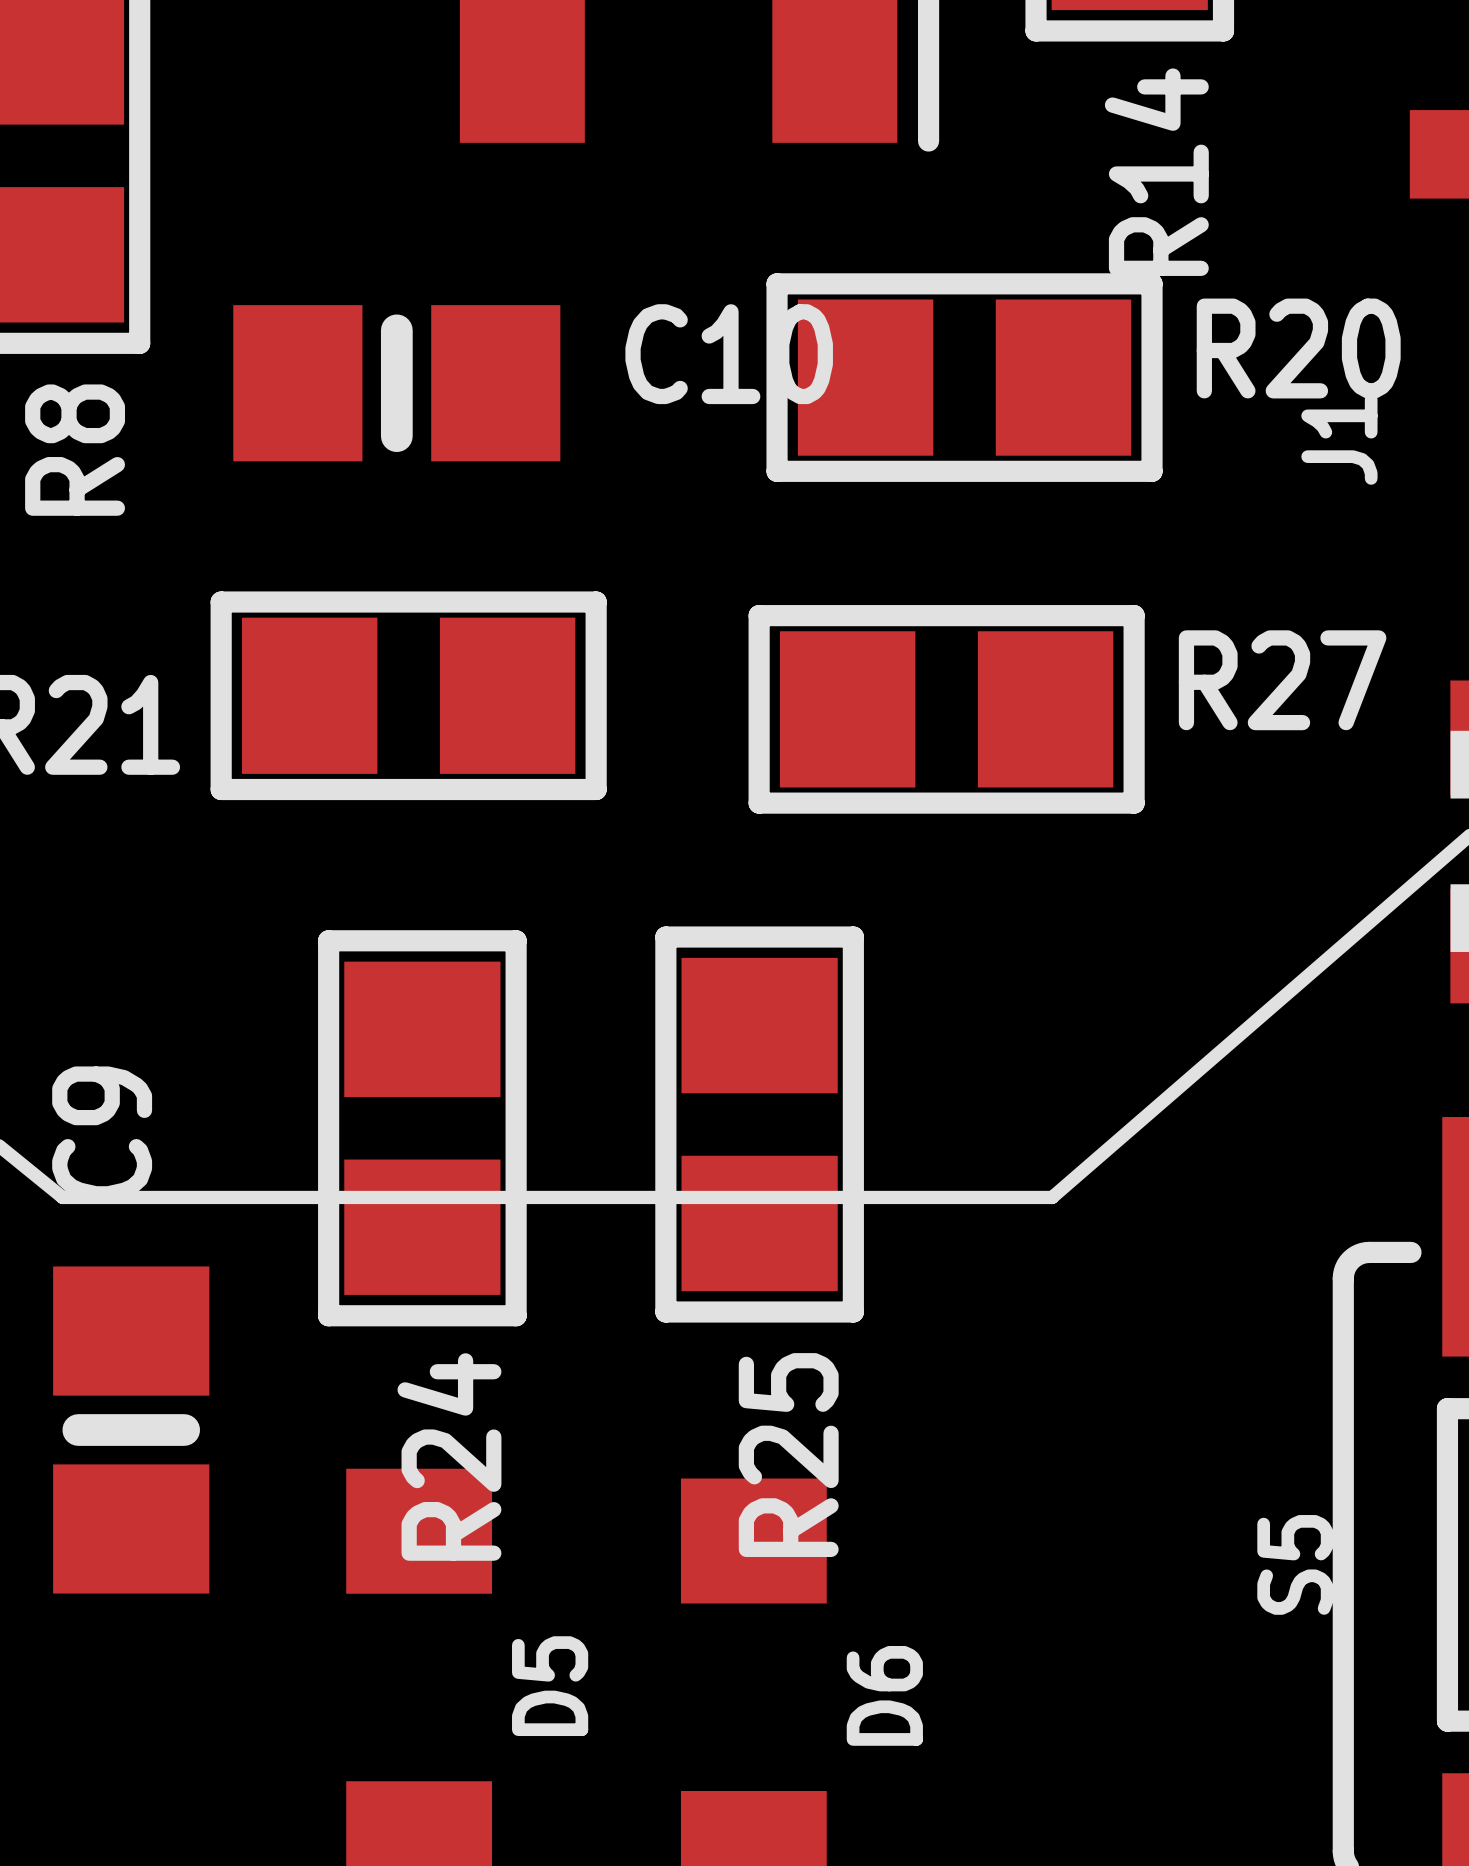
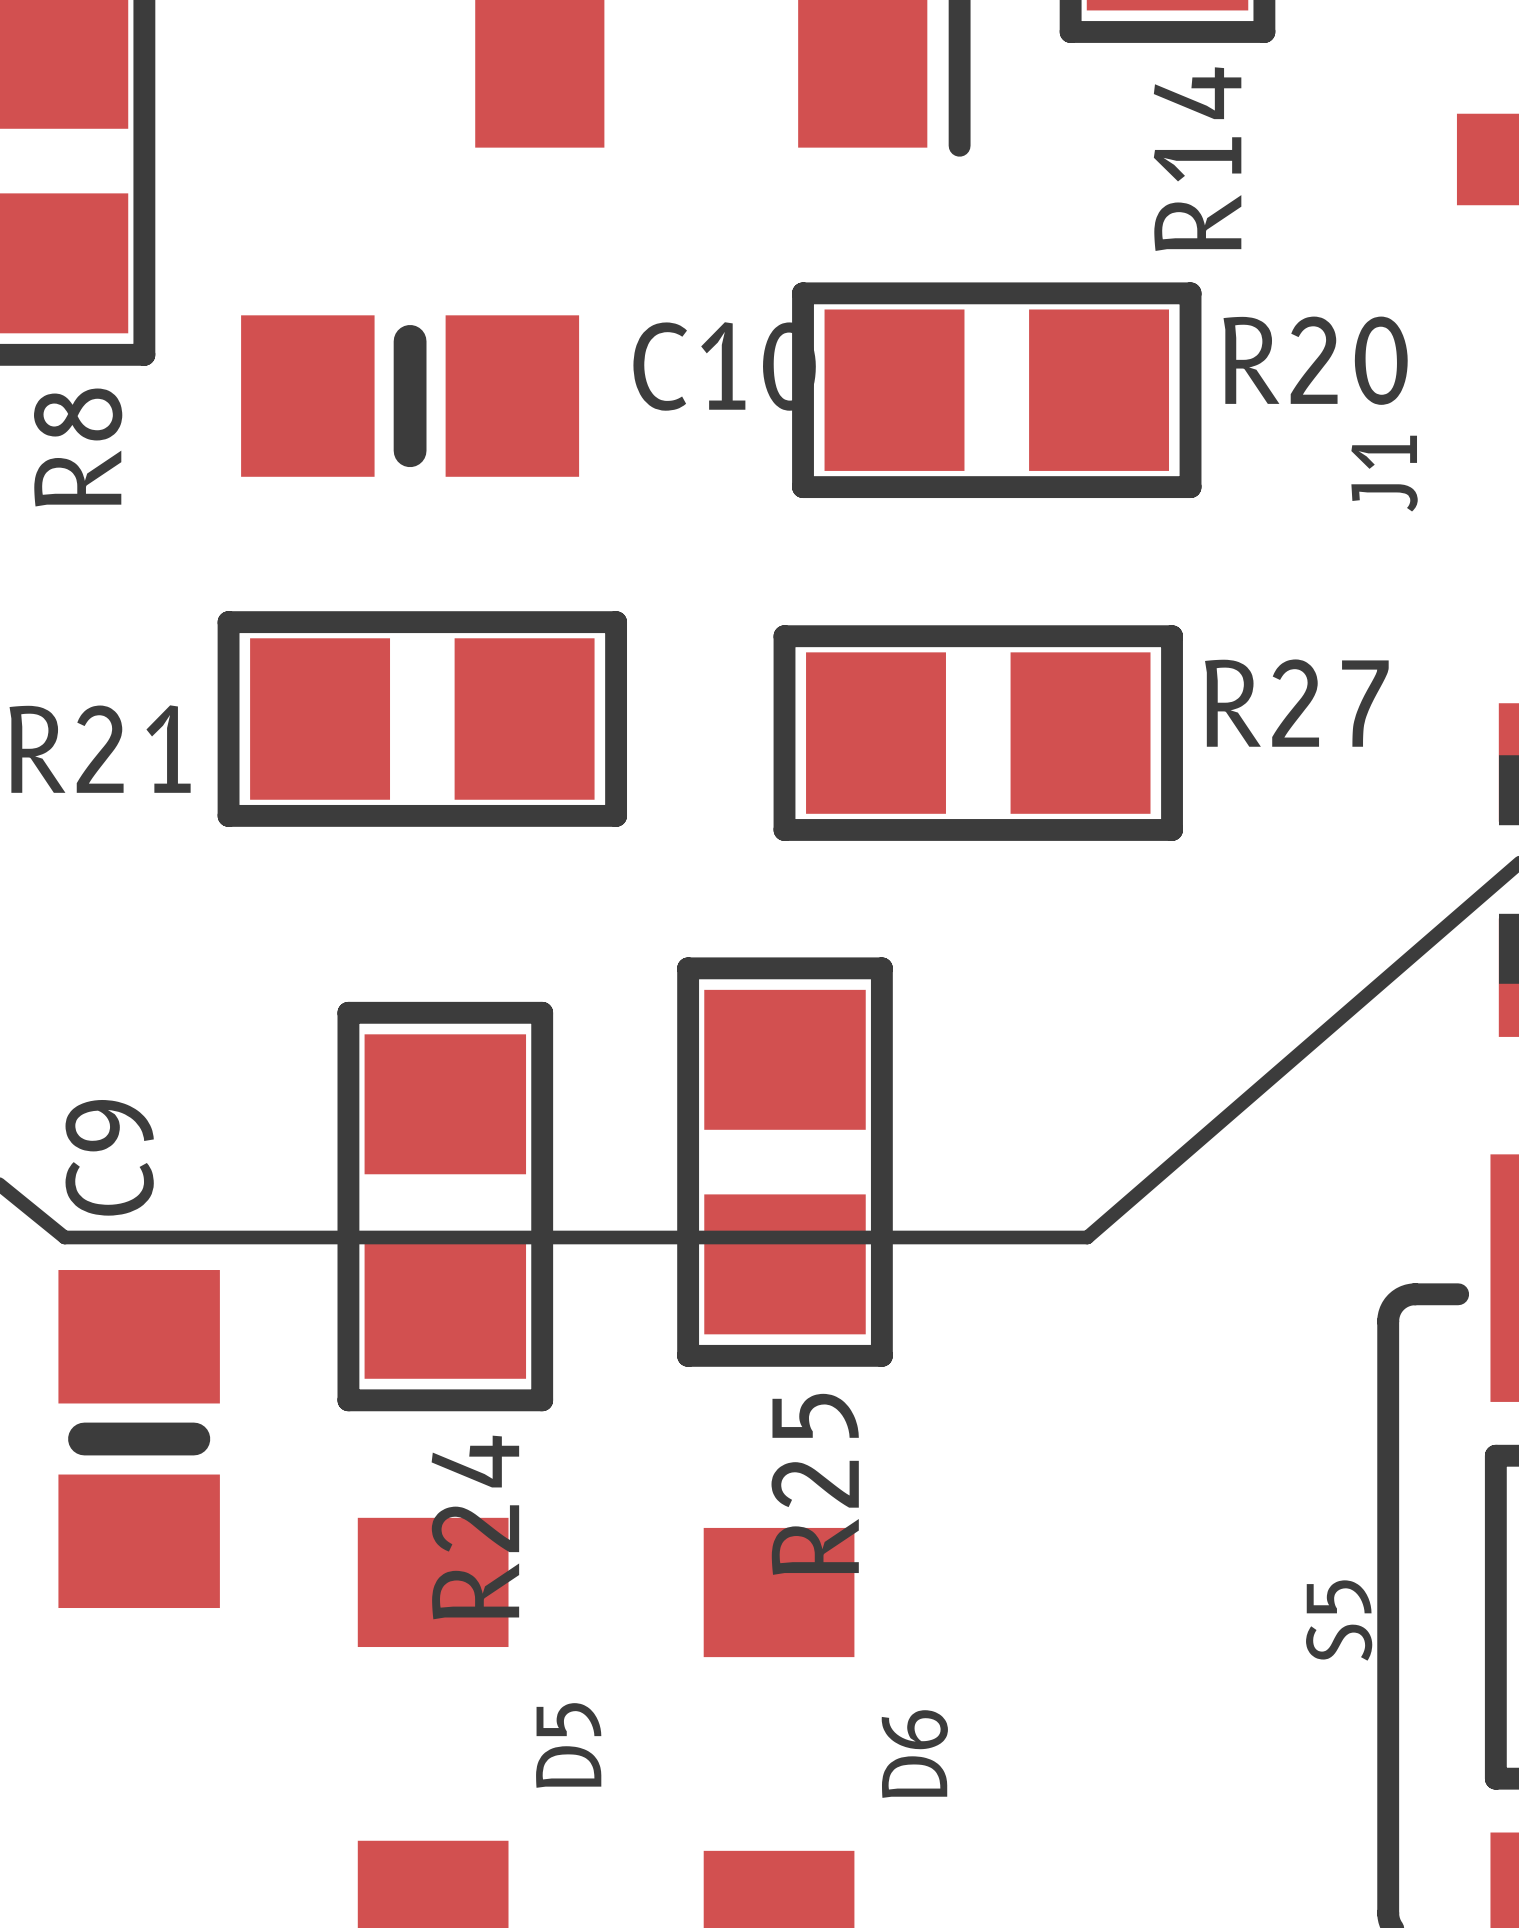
R24 position: (422, 1128) -> (445, 1206)
C9 position: (131, 1430) -> (139, 1439)

